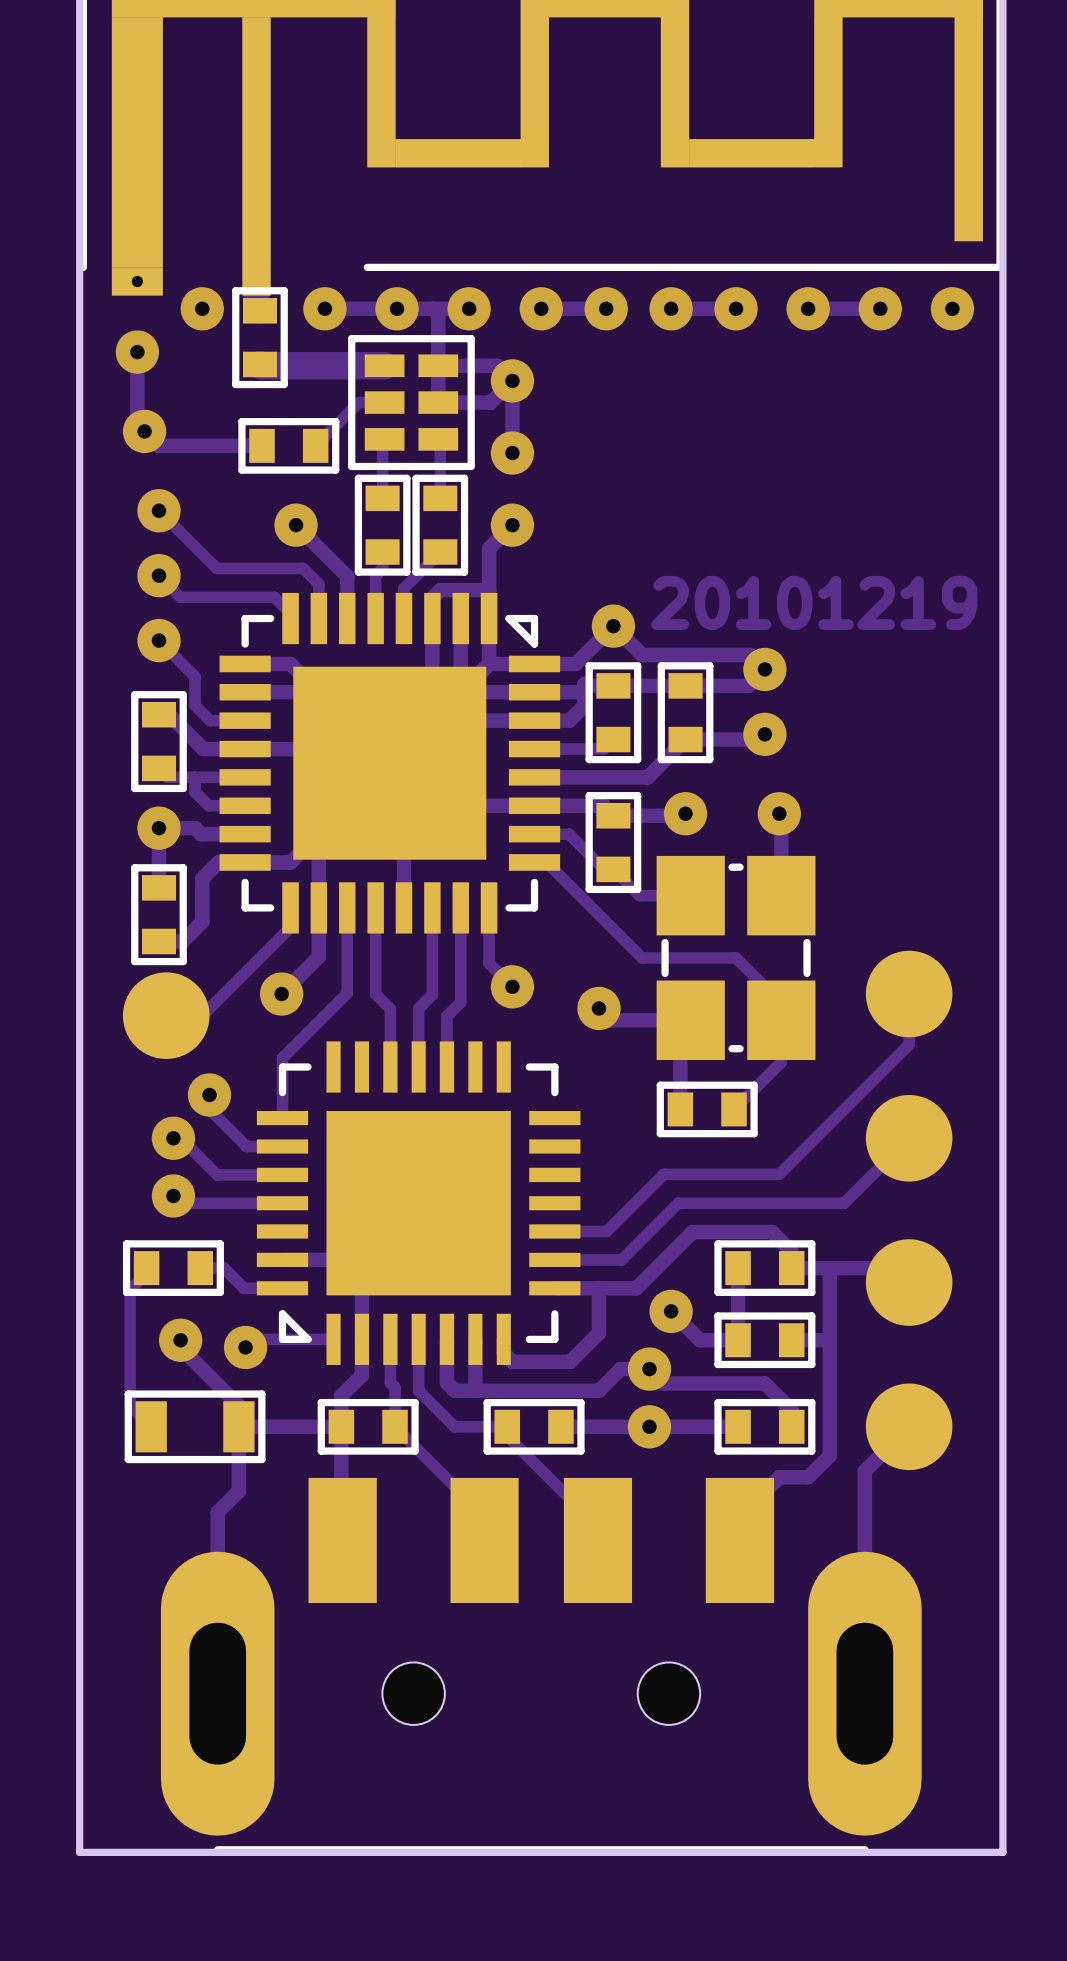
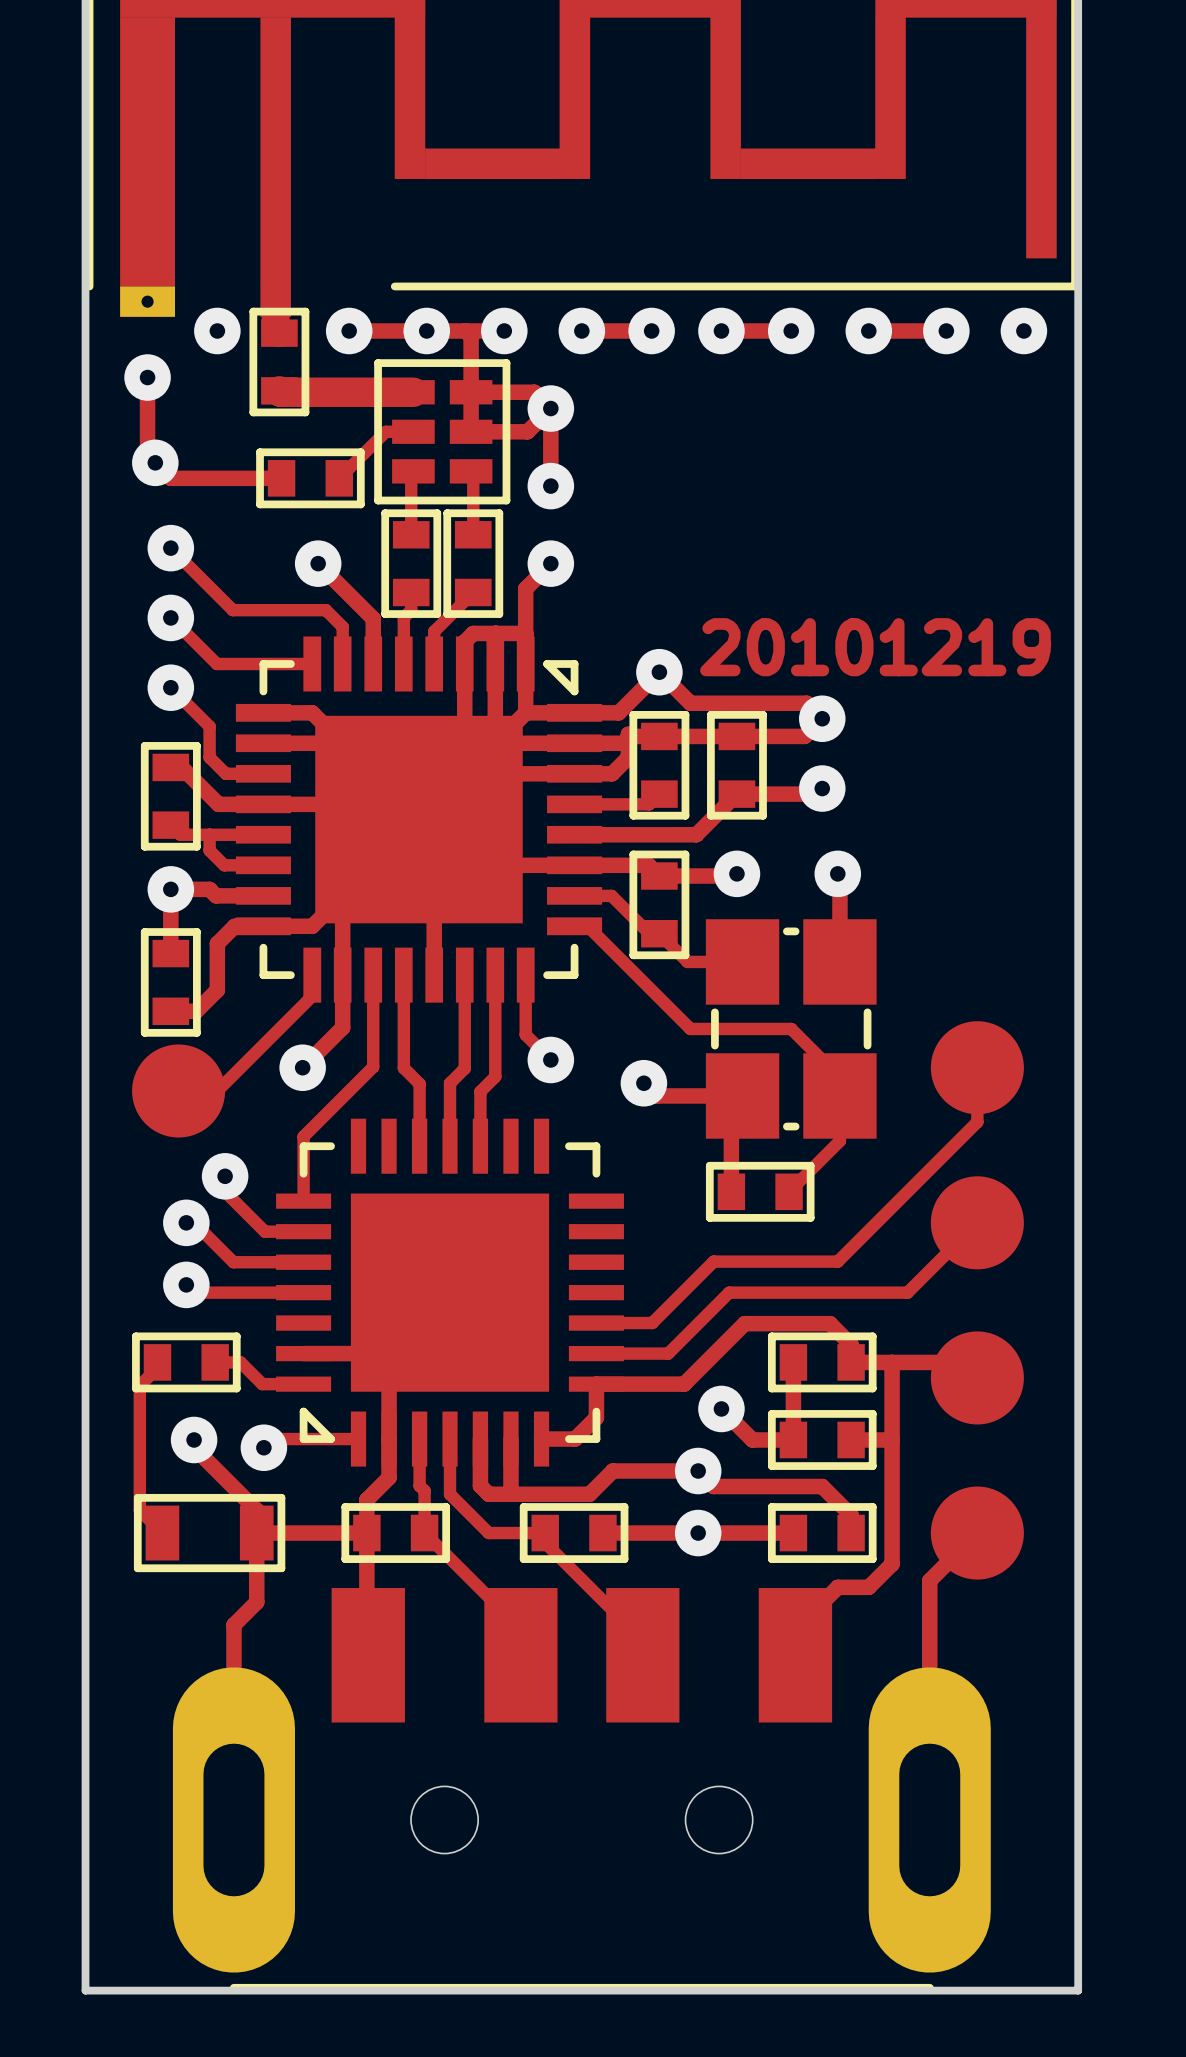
track: (180, 597) (274, 597) (290, 613) (290, 618) -> (194, 641) (216, 664) (312, 664)
track: (599, 1288) (599, 1333) (570, 1361) (512, 1361) (503, 1353) (503, 1339) -> (596, 1384) (596, 1417) (575, 1439) (541, 1439)
track: (620, 1369) (599, 1390) (548, 1390) -> (667, 1471) (612, 1471) (589, 1494)

